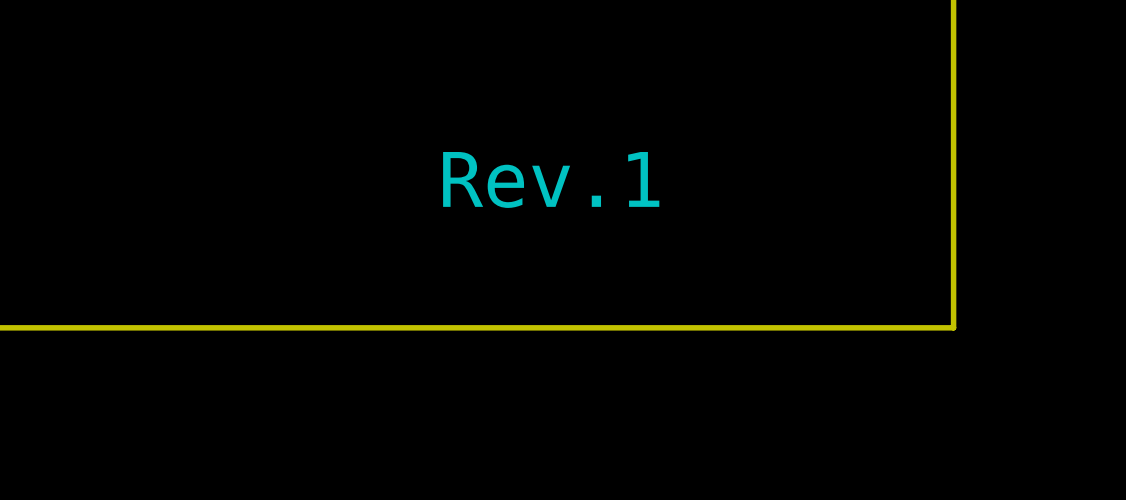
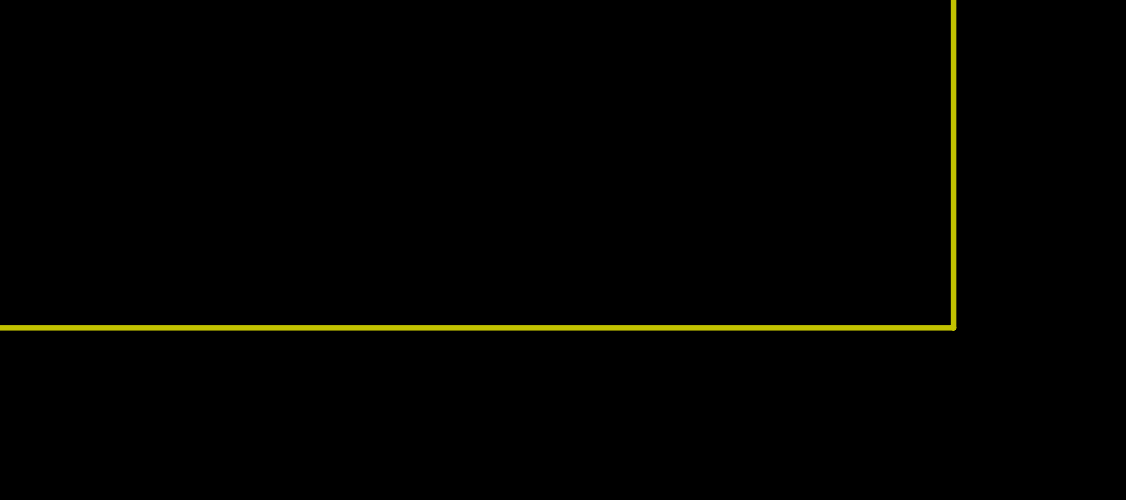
text: Rev.1 (551, 179) -> none

